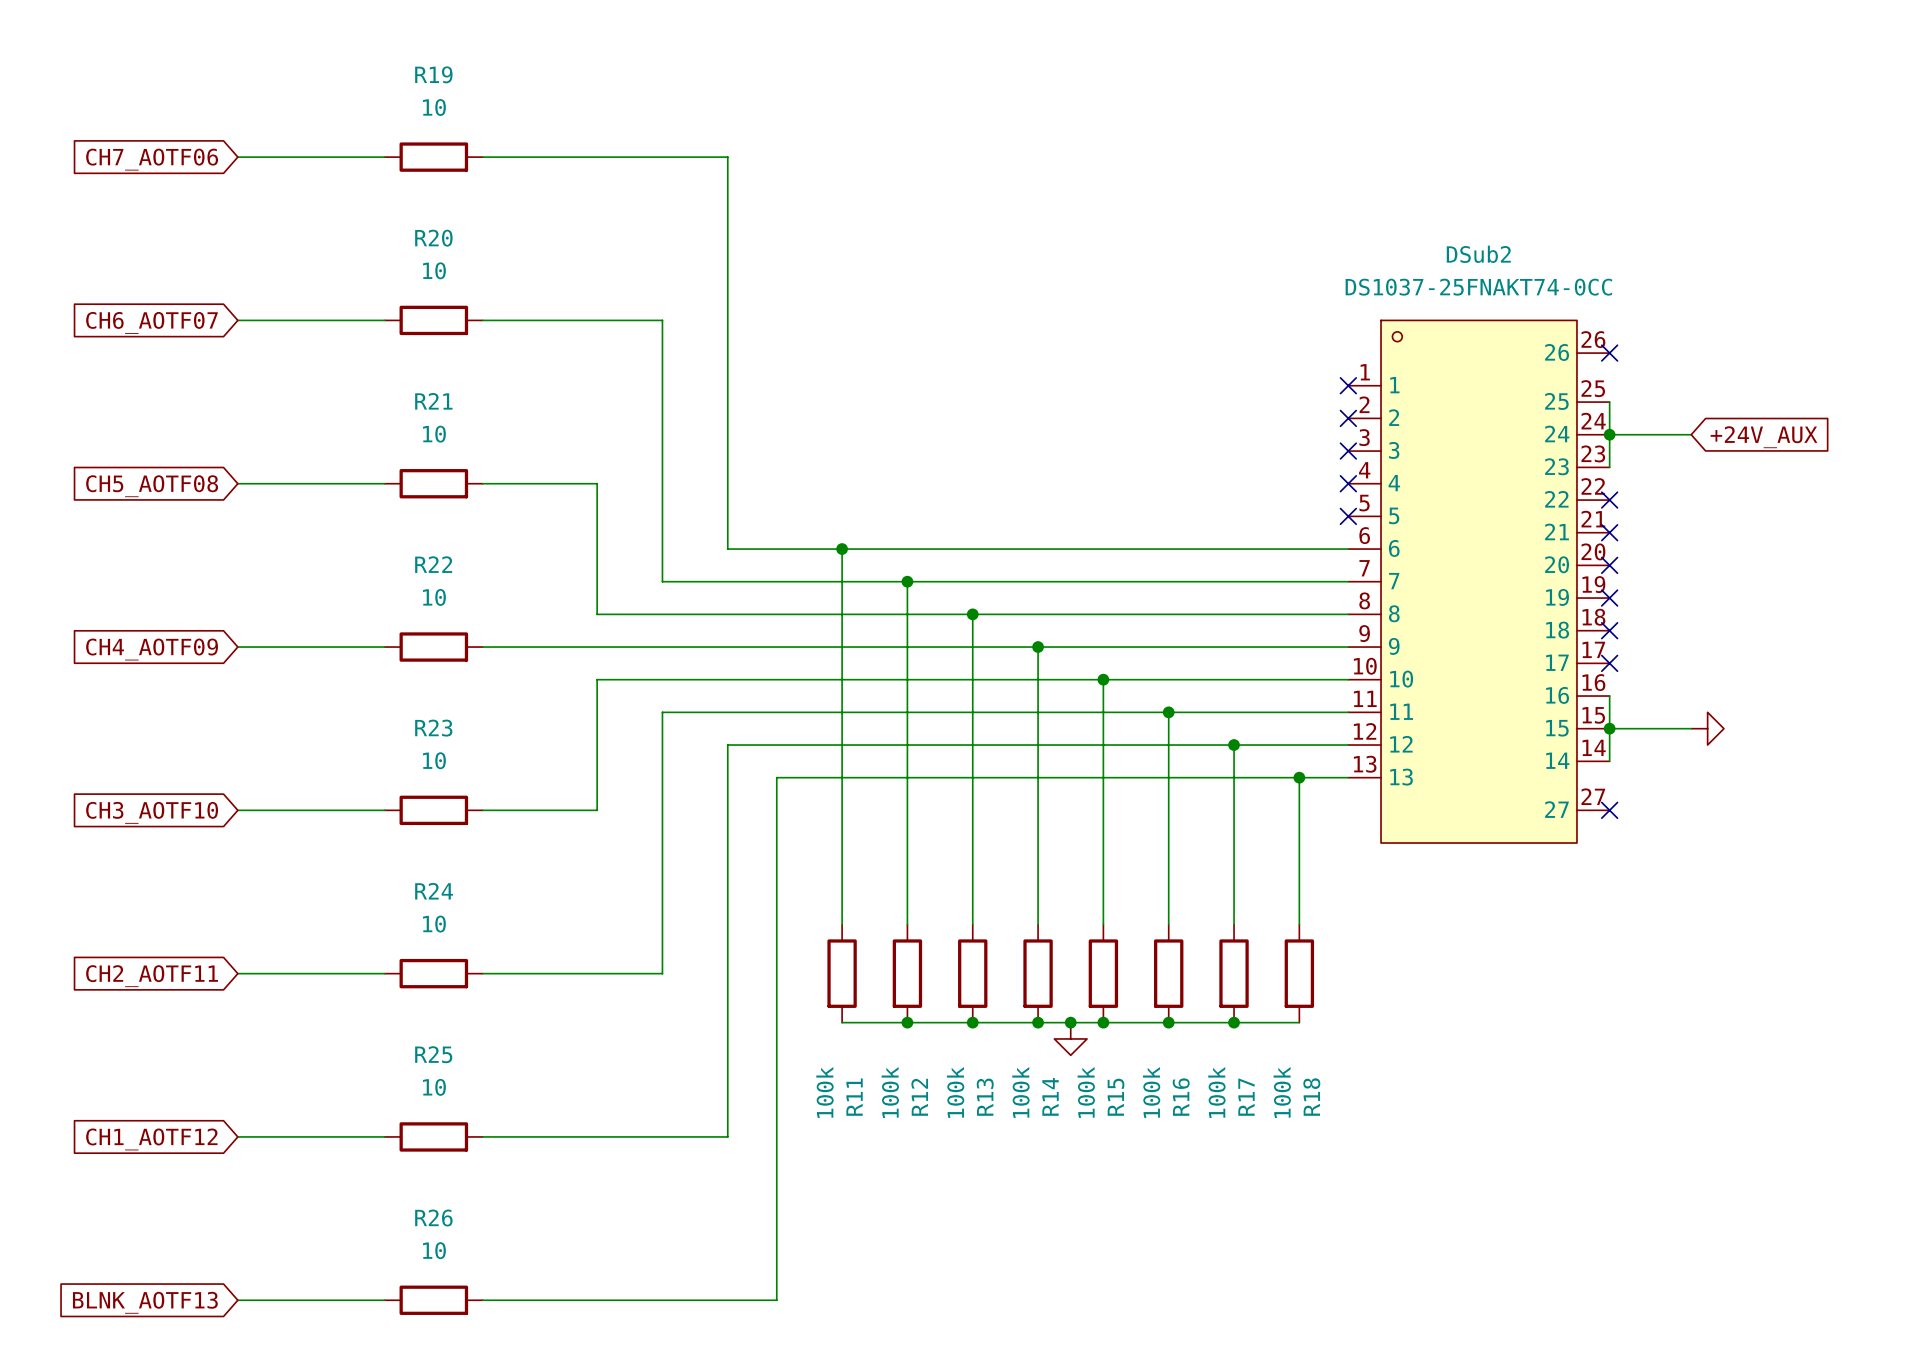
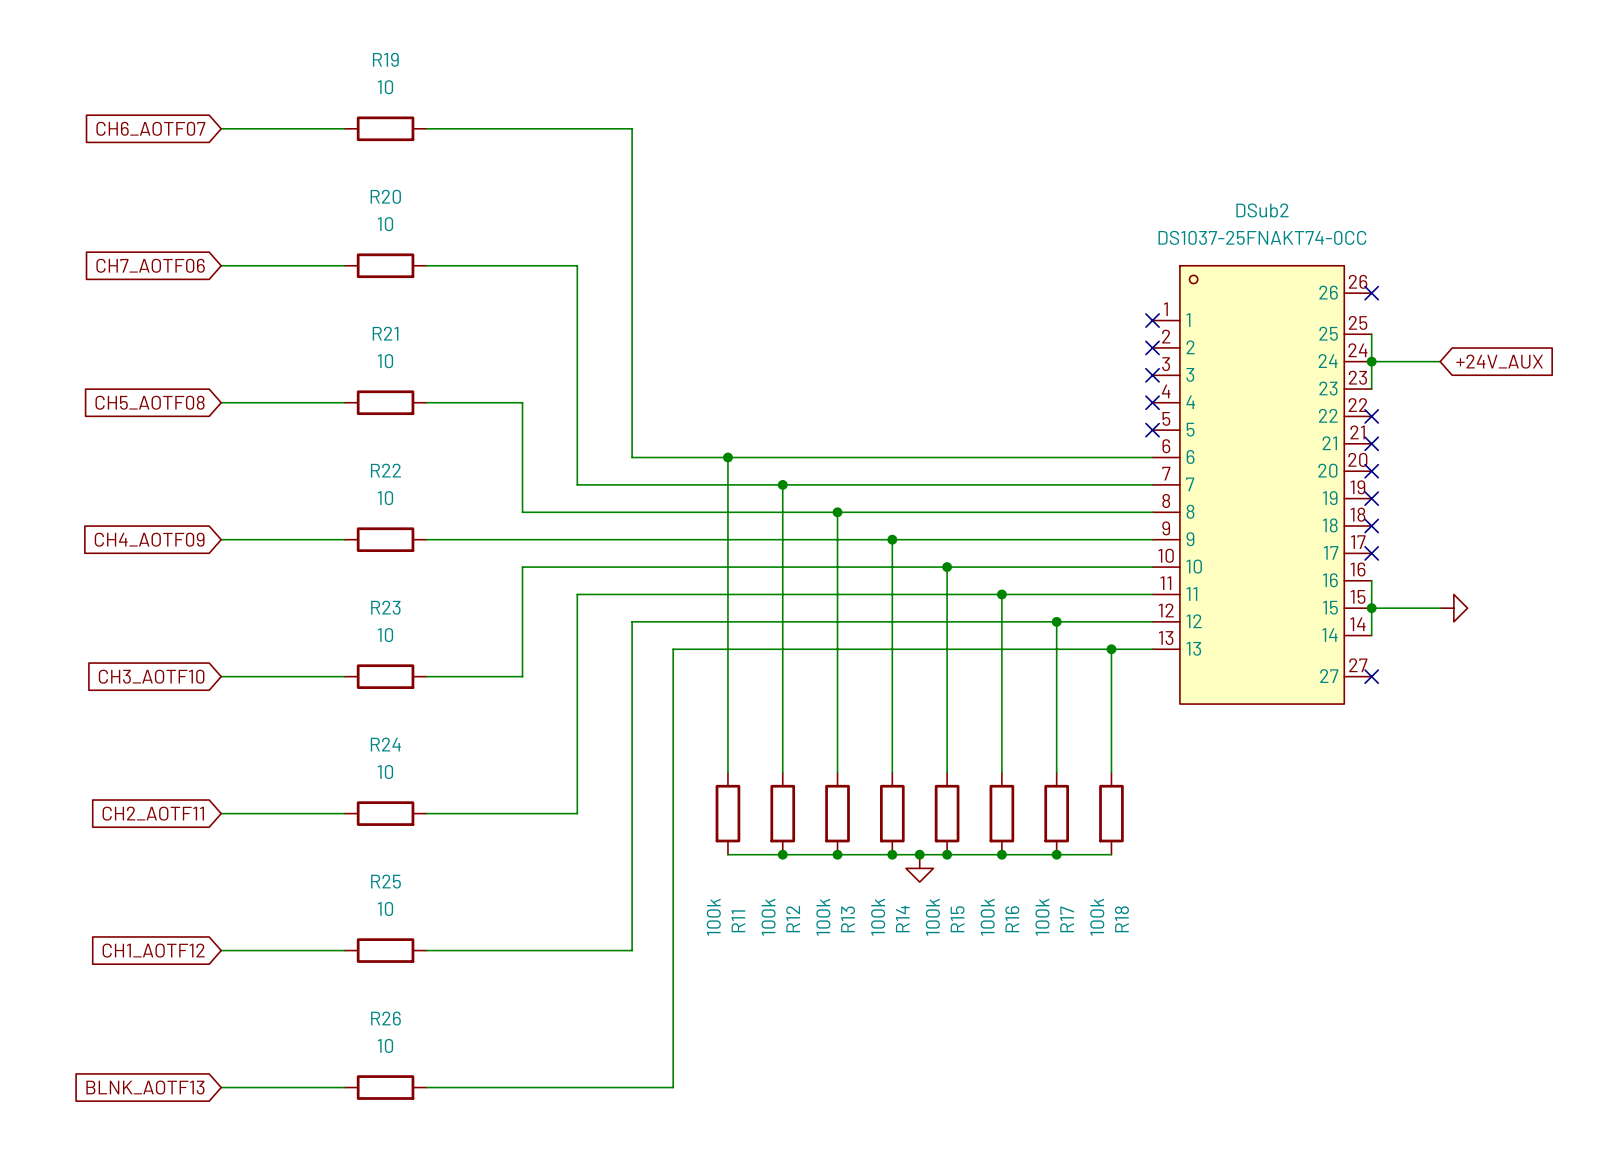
global label: CH7_AOTF06 (152, 159) -> CH6_AOTF07 (150, 128)
global label: CH6_AOTF07 (151, 322) -> CH7_AOTF06 (150, 265)

